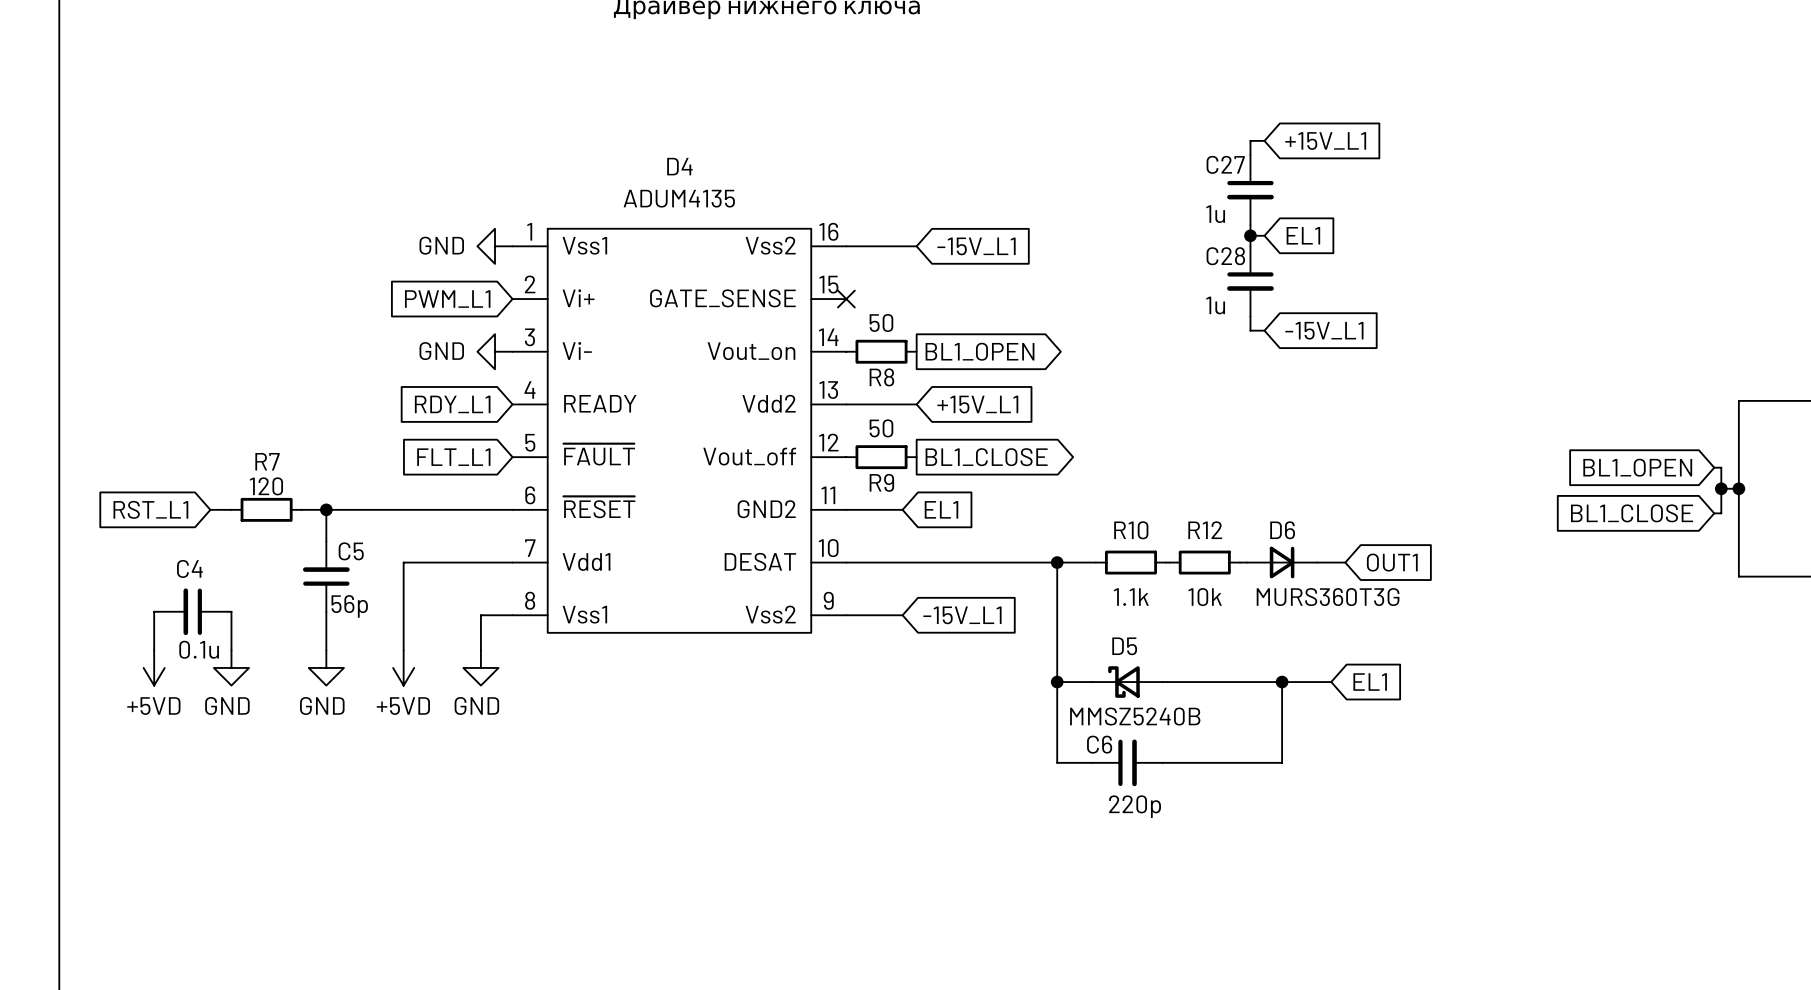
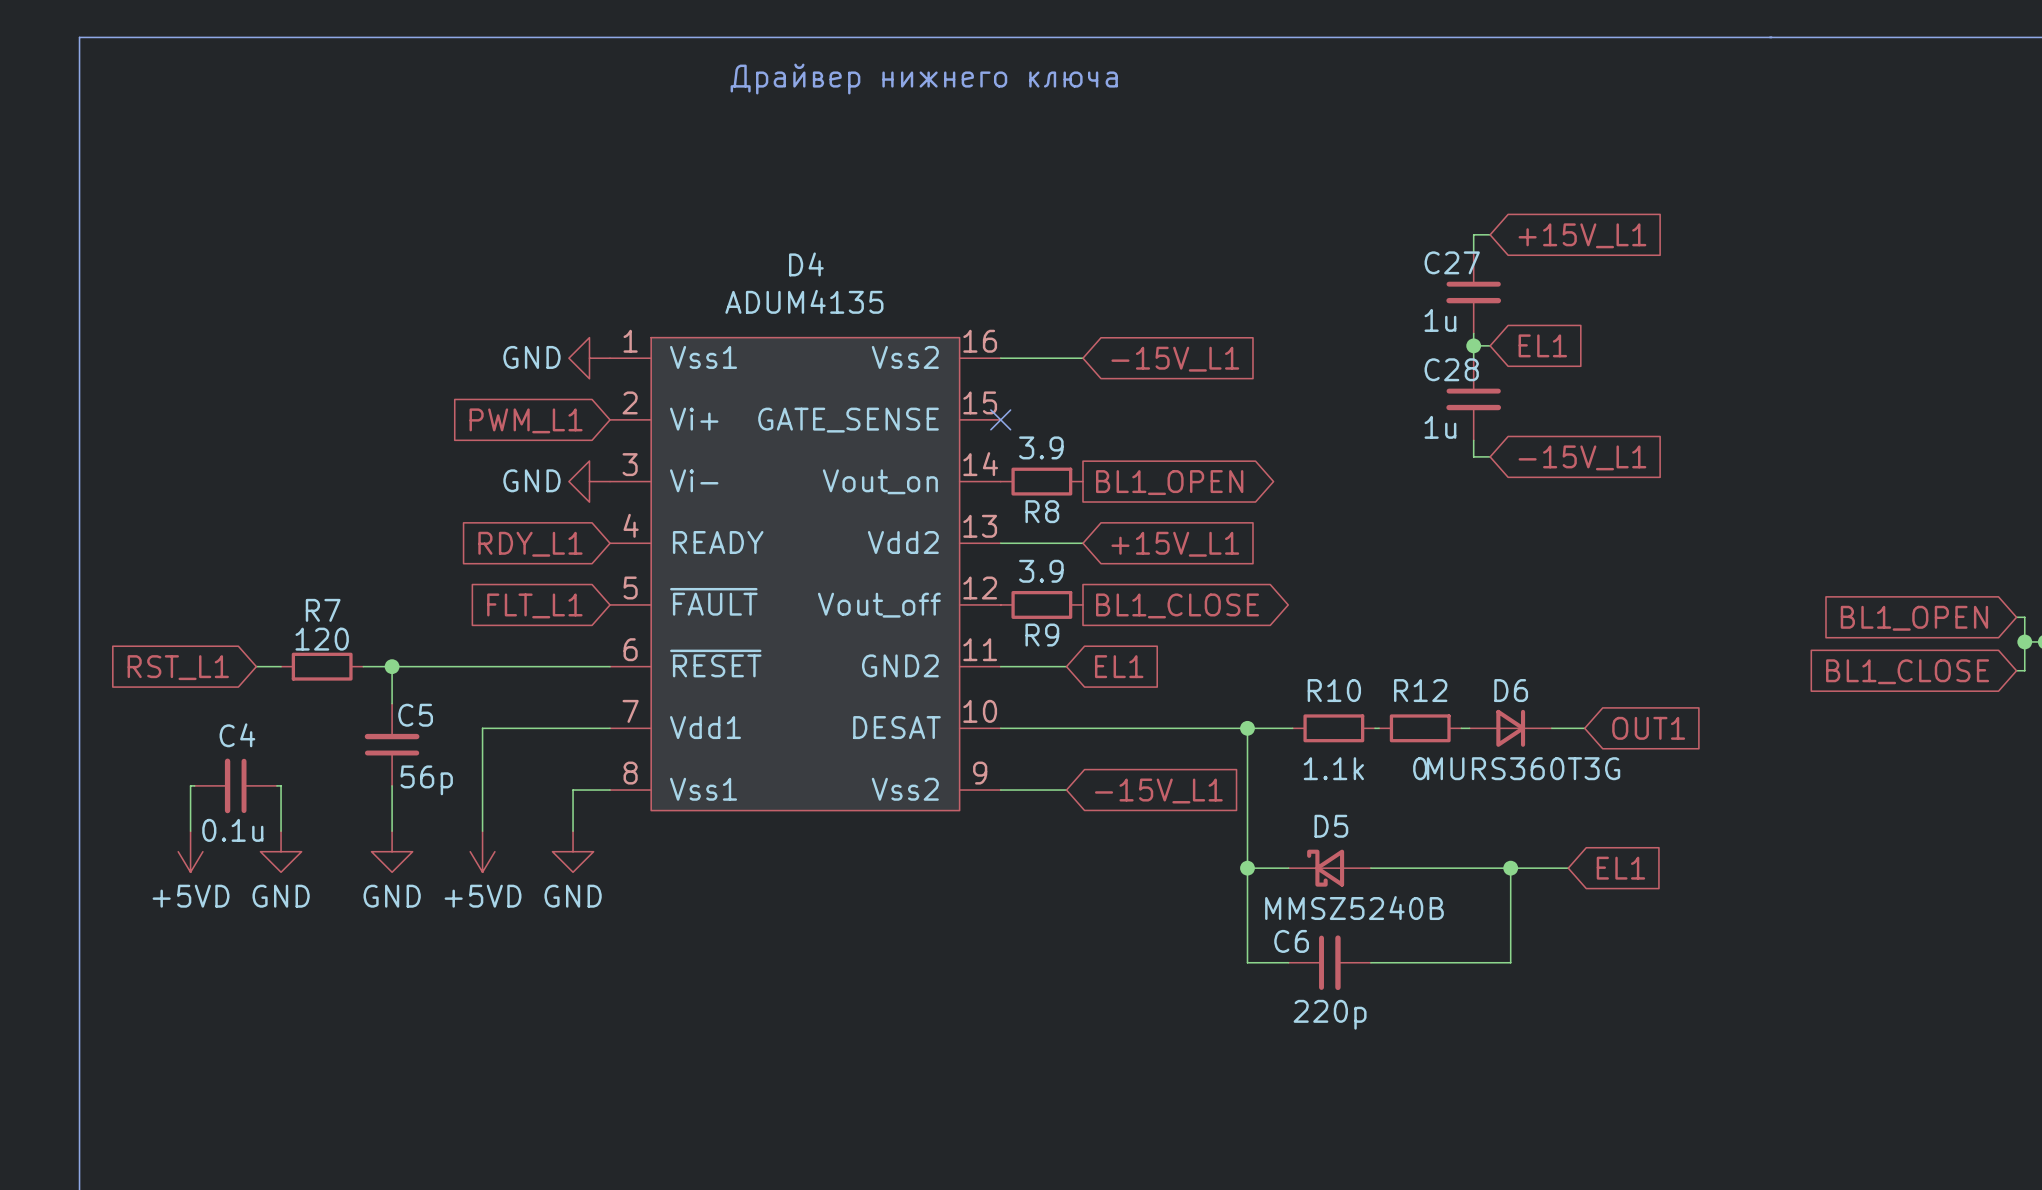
R8 value: 50 (881, 322) -> 3.9 (1041, 447)
R9 value: 50 (881, 428) -> 3.9 (1041, 571)
R12 value: 10k (1205, 597) -> 0 (1420, 768)
D6 value position: MURS360T3G (1328, 597) -> MURS360T3G (1523, 768)

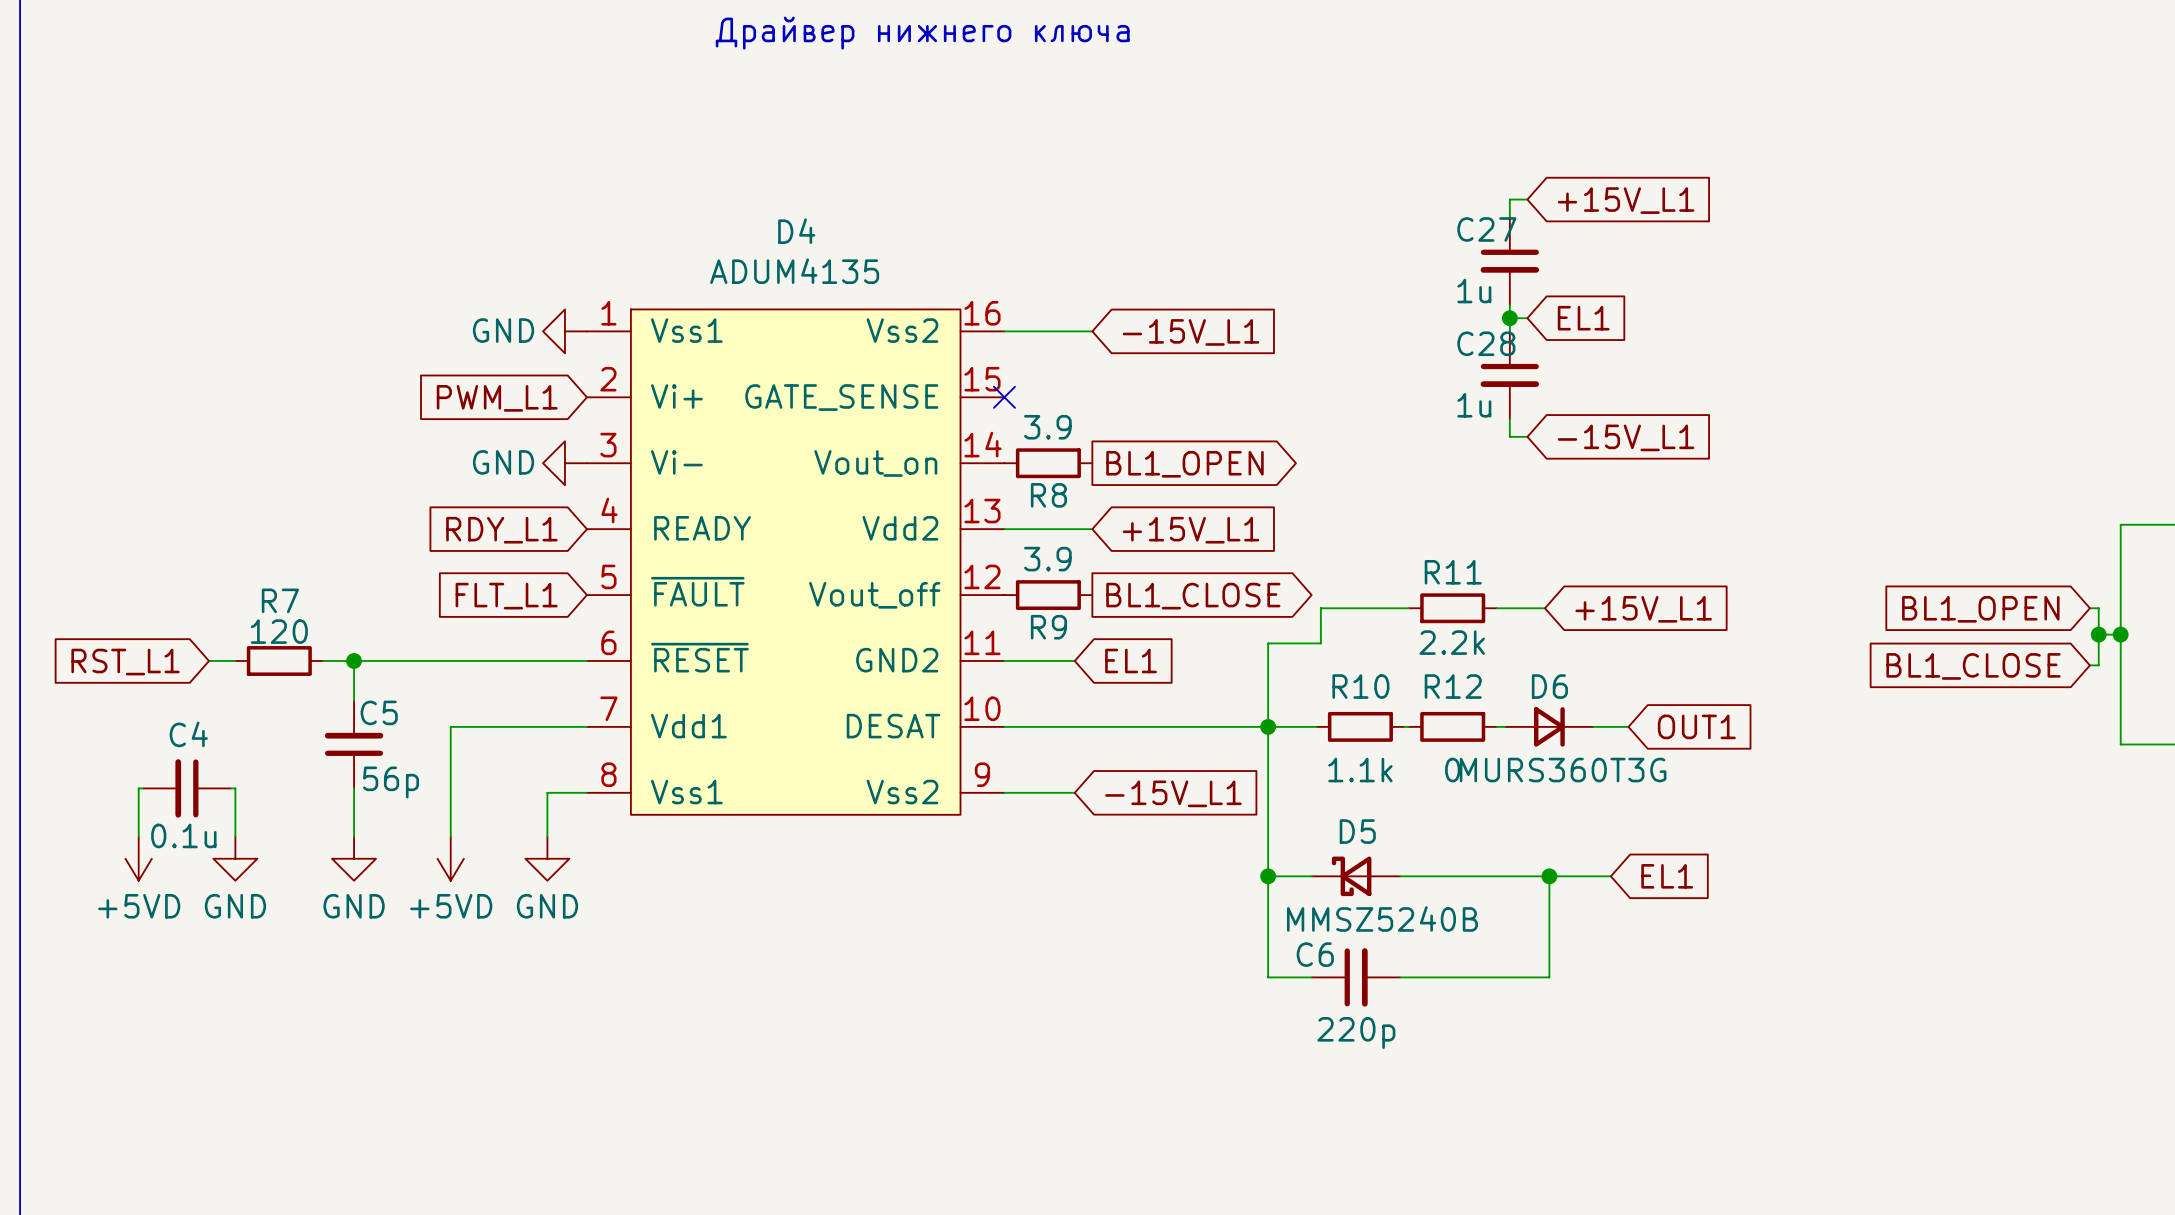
wire: none -> (1408, 608) (1320, 608) (1320, 643) (1268, 643) (1268, 726)
R11: none -> 2.2k (1452, 608)
wire: none -> (1496, 608) (1545, 608)
global label: none -> +15V_L1 (1643, 609)

